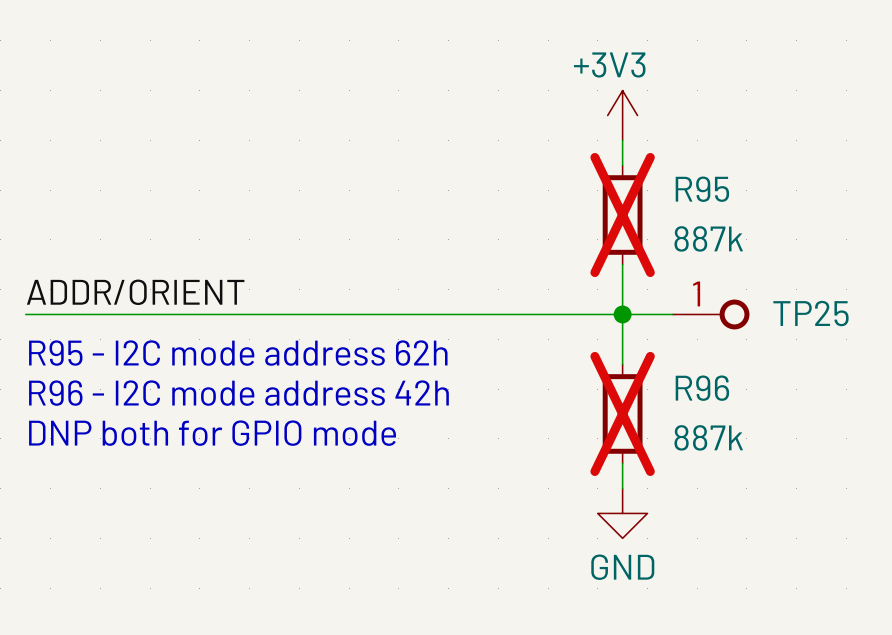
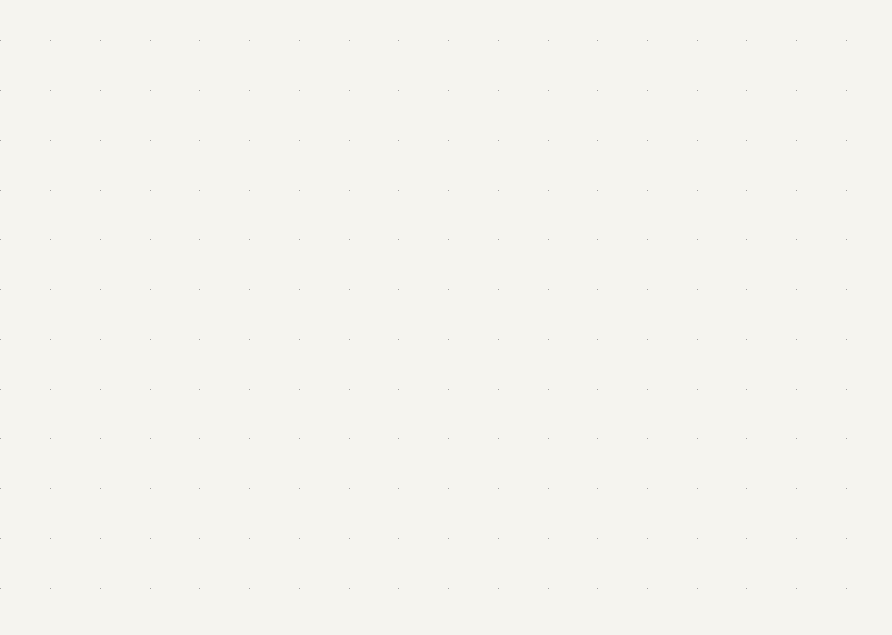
power symbol: +3V3 (622, 115) -> none
wire: (622, 140) (622, 165) -> none
R95: (622, 215) -> none
wire: (622, 264) (622, 364) -> none
label: ADDR/ORIENT (135, 292) -> none
wire: (25, 314) (672, 314) -> none
junction: (622, 314) -> none
TP25: (710, 314) -> none
text: R95 - I2C mode address 62h (238, 353) -> none
text: R96 - I2C mode address 42h (238, 393) -> none
R96: (622, 413) -> none
text: DNP both for GPIO mode (212, 433) -> none
wire: (622, 463) (622, 488) -> none
power symbol: GND (622, 513) -> none

